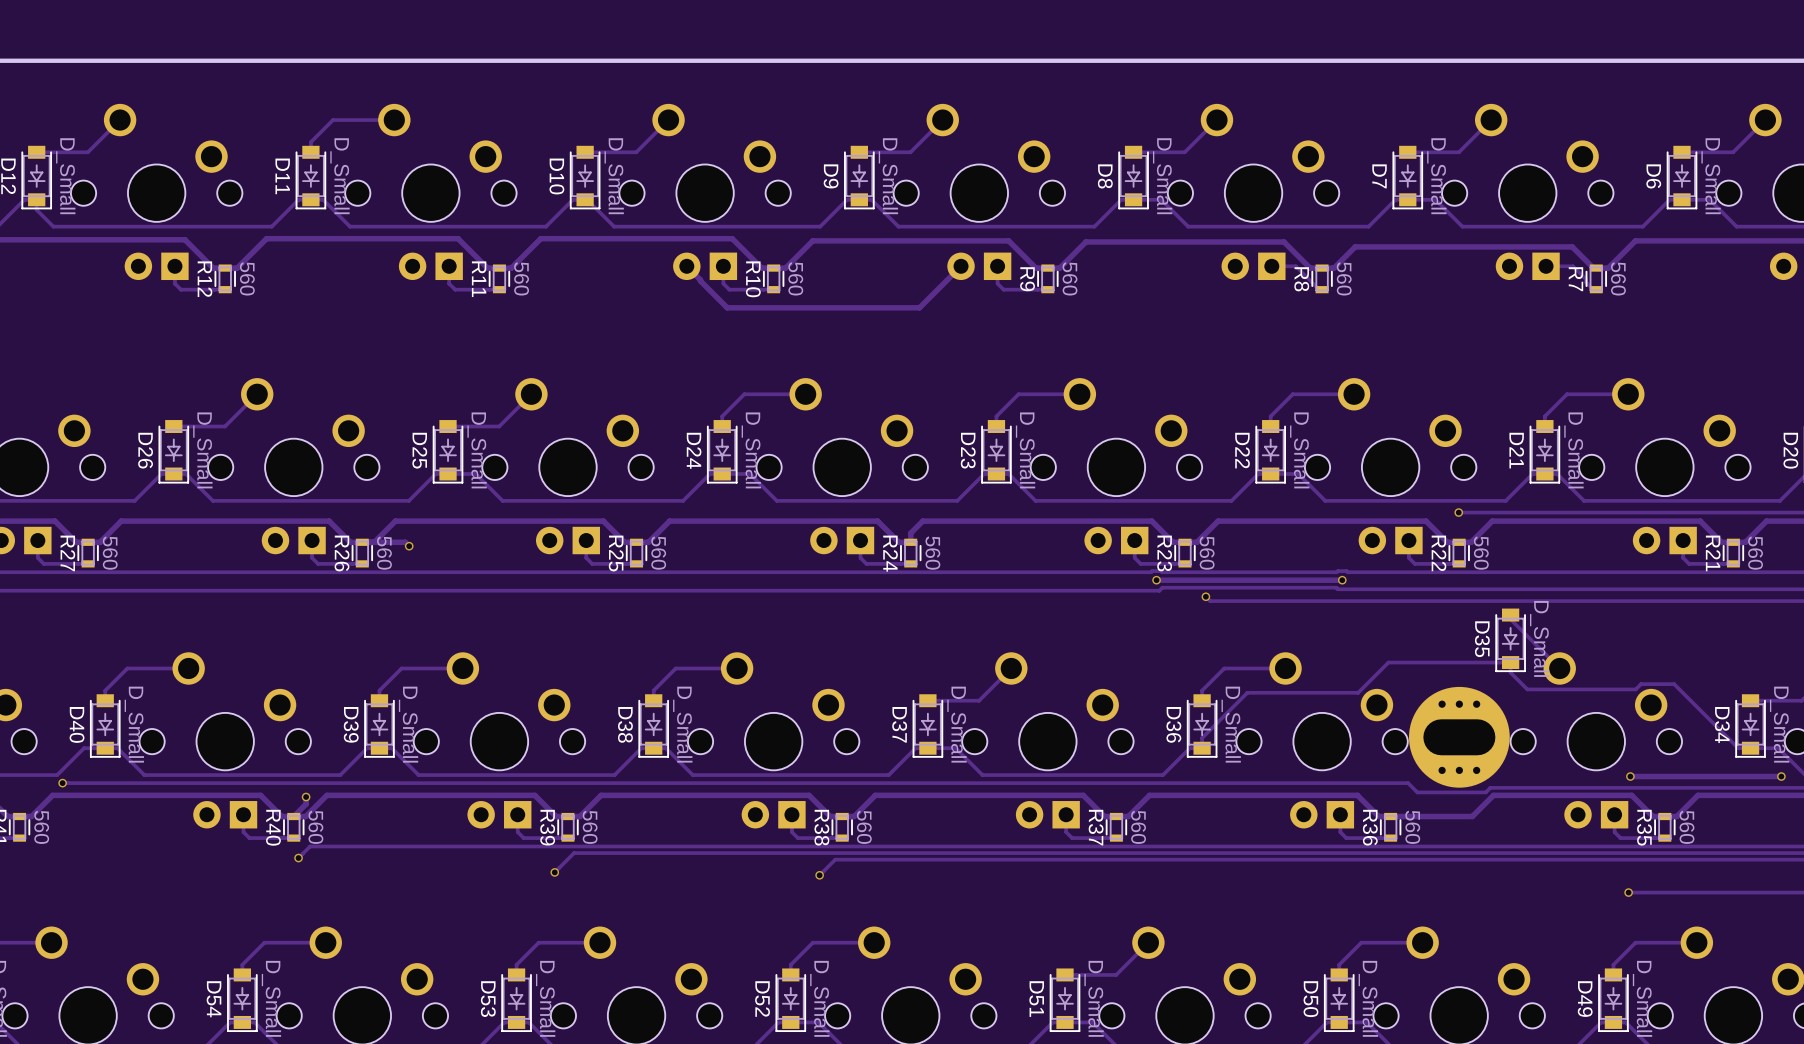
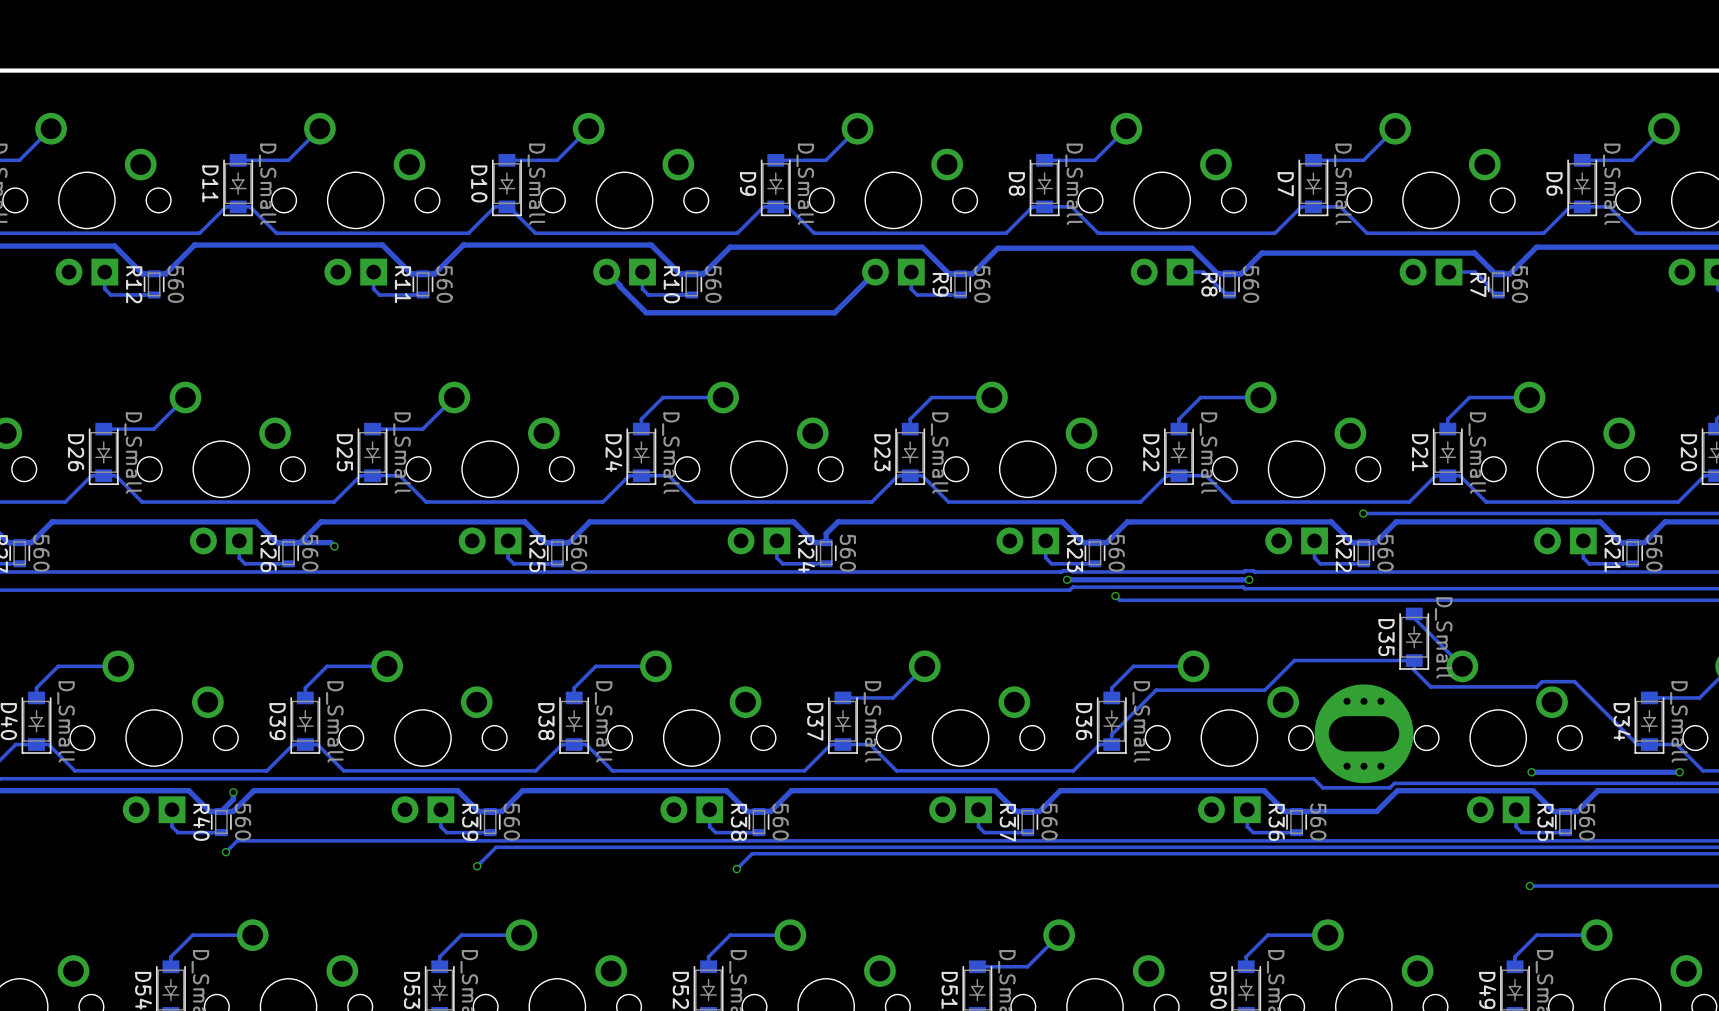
track: (394, 120) (333, 120) (310, 142) (310, 152) -> (319, 128) (288, 160) (238, 160)

